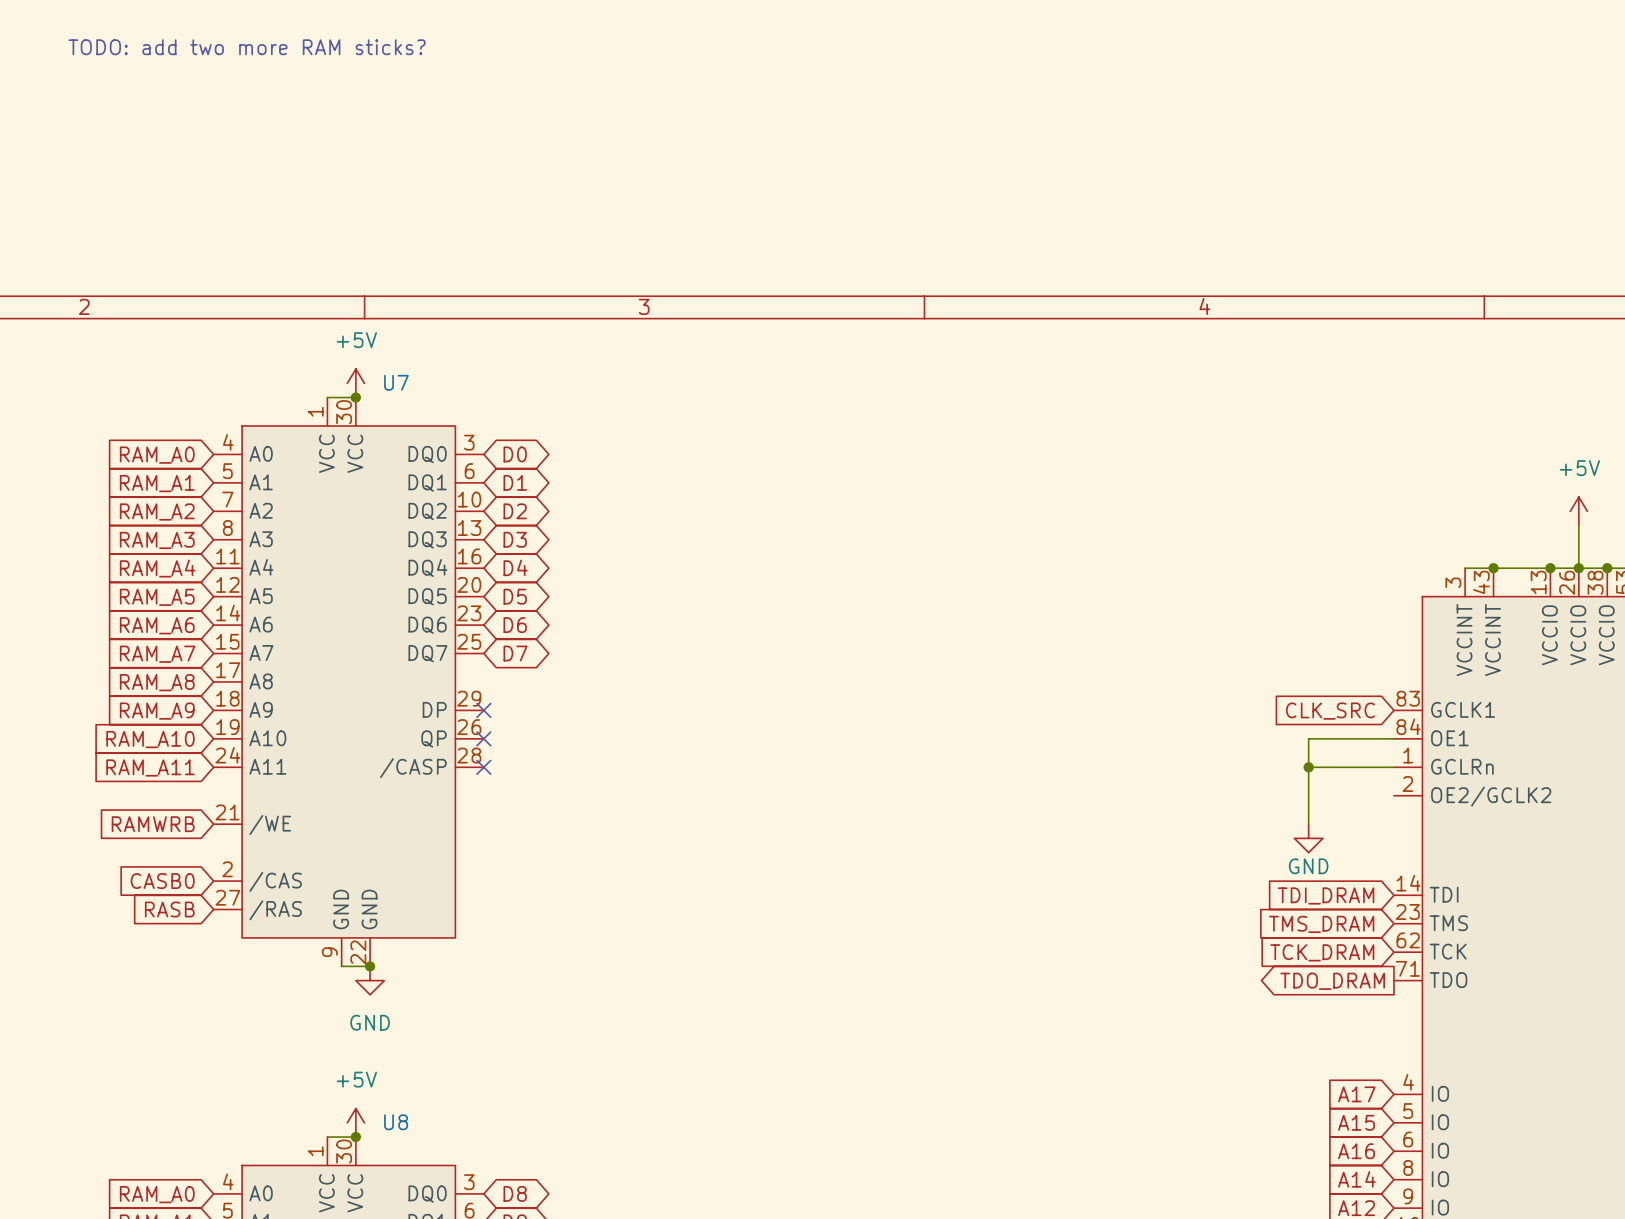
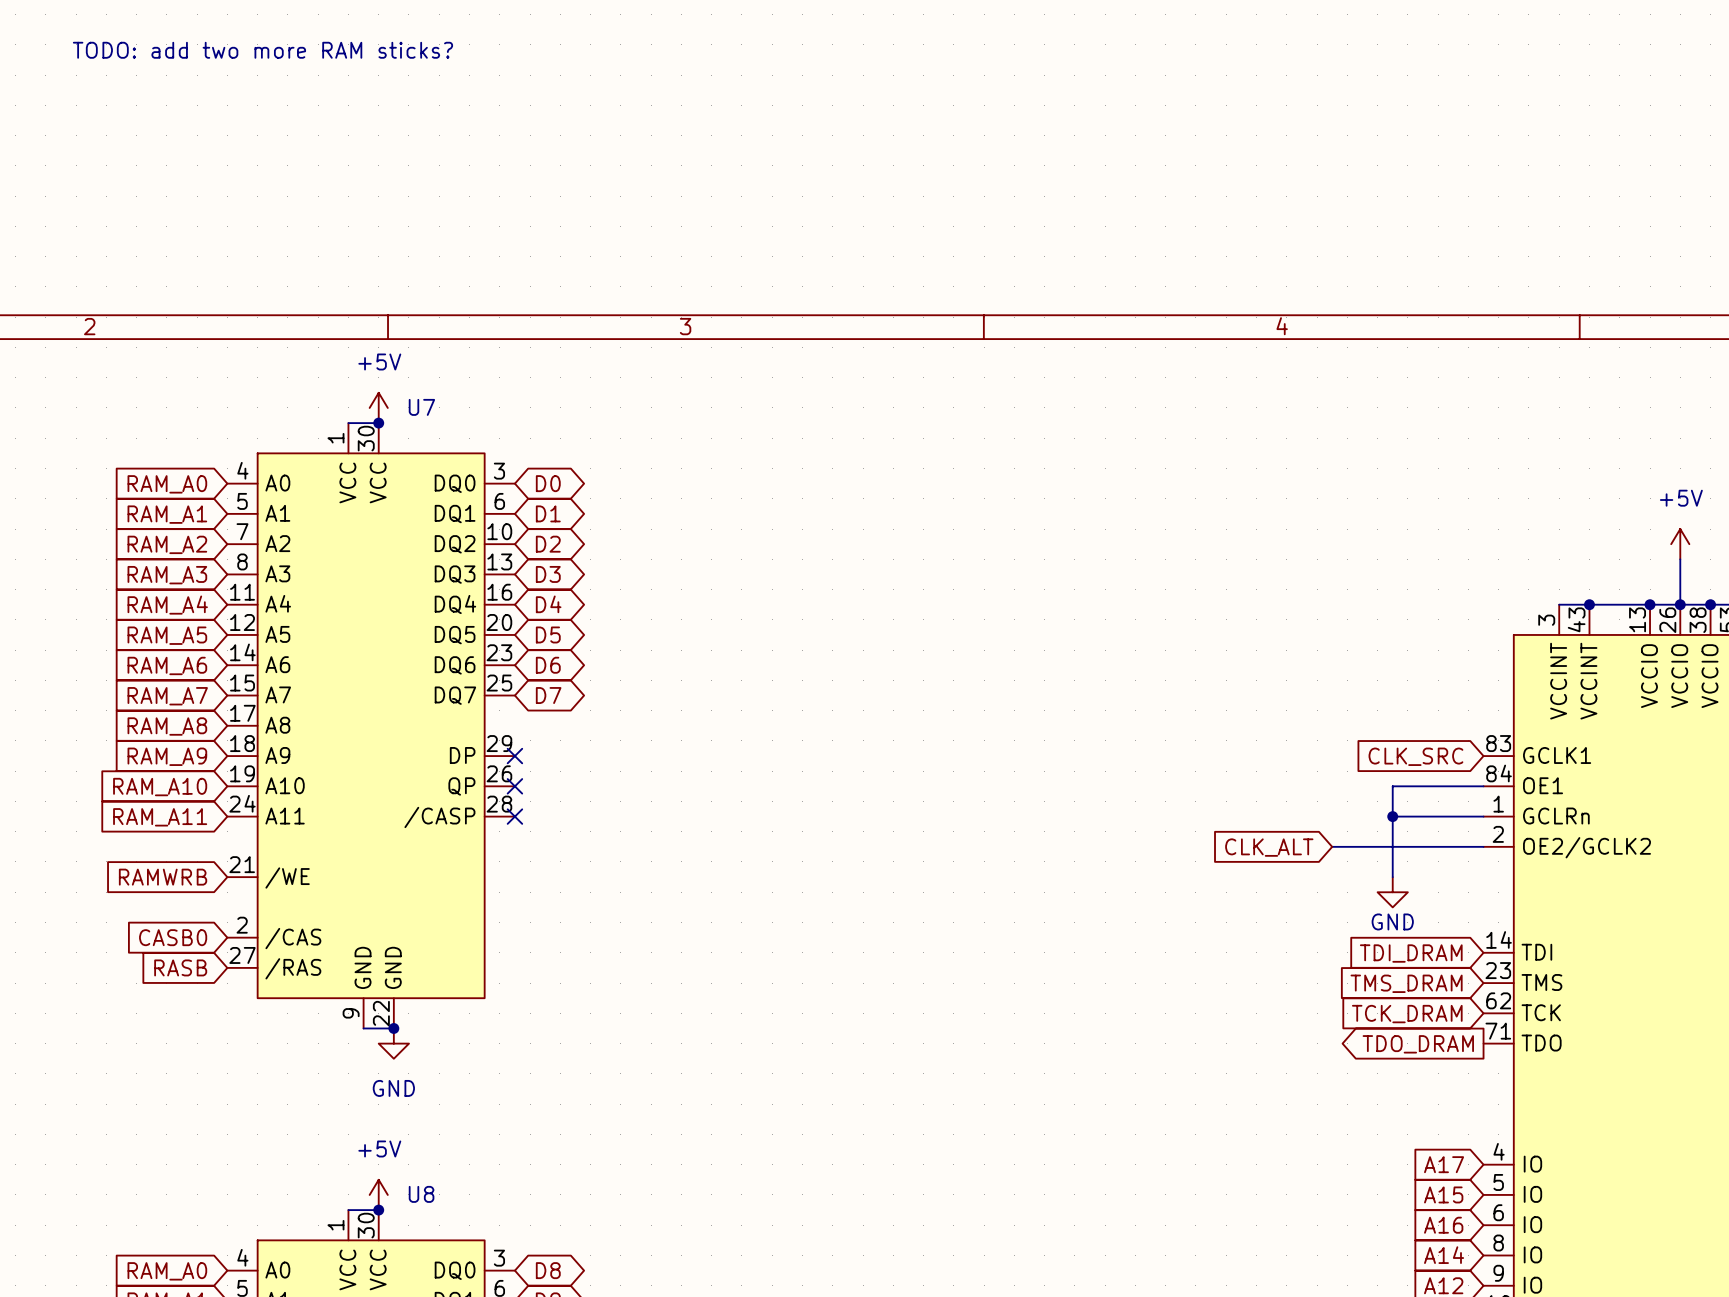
wire: none -> (1332, 846) (1483, 846)
global label: none -> CLK_ALT (1269, 847)

